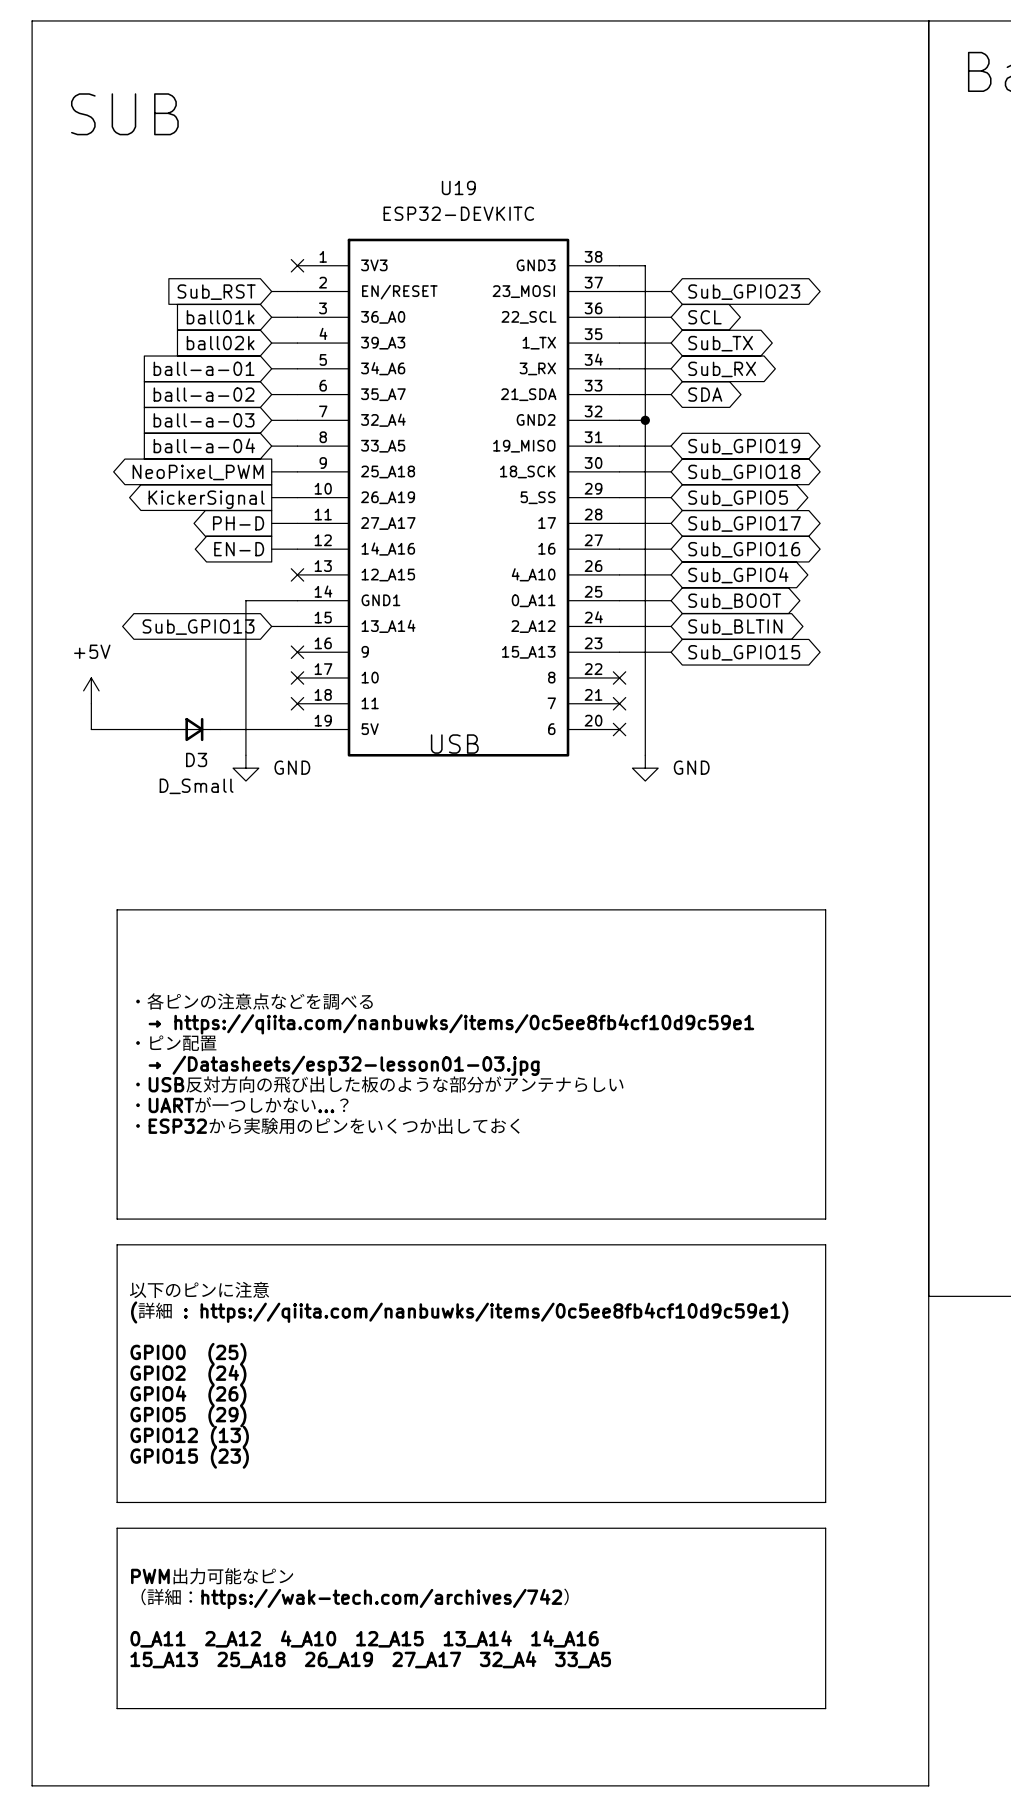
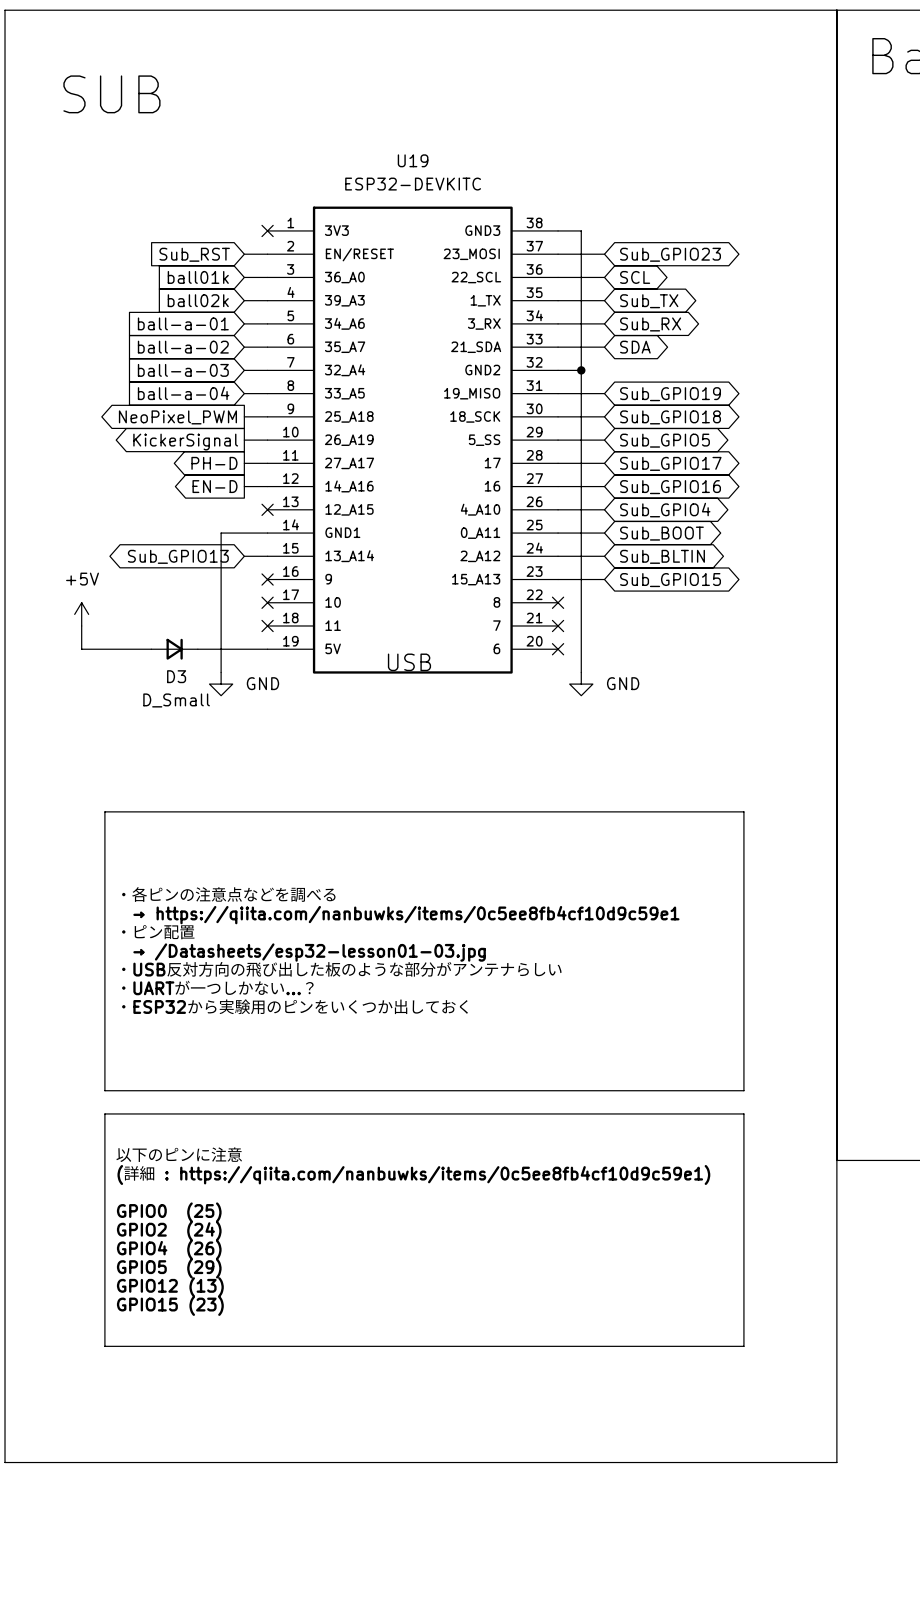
line: (32, 20) (32, 1785) (928, 1785) (928, 1631) -> (28, 10) (5, 10) (5, 1462) (836, 1462)
line: (117, 1528) (825, 1528) (825, 1708) (117, 1708) (117, 1528) -> none
text: PWM出力可能なピン (212, 1576) -> none
text: （詳細：https://wak-tech.com/archives/742） (355, 1598) -> none
text: 0_A11 2_A12 4_A10 12_A15 13_A14 14_A16 (364, 1638) -> none
text: 15_A13 25_A18 26_A19 27_A17 32_A4 33_A5 (370, 1659) -> none

